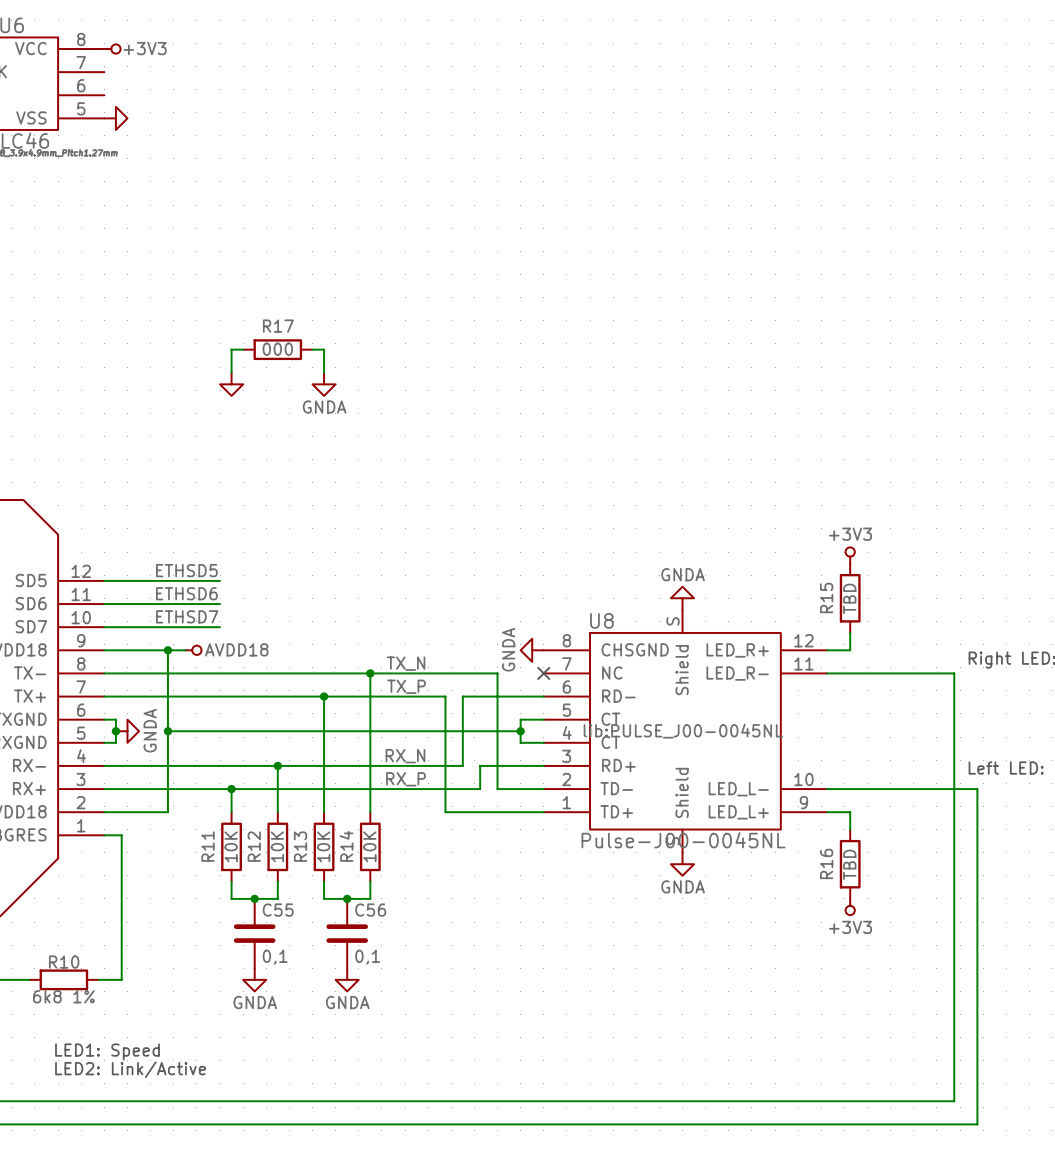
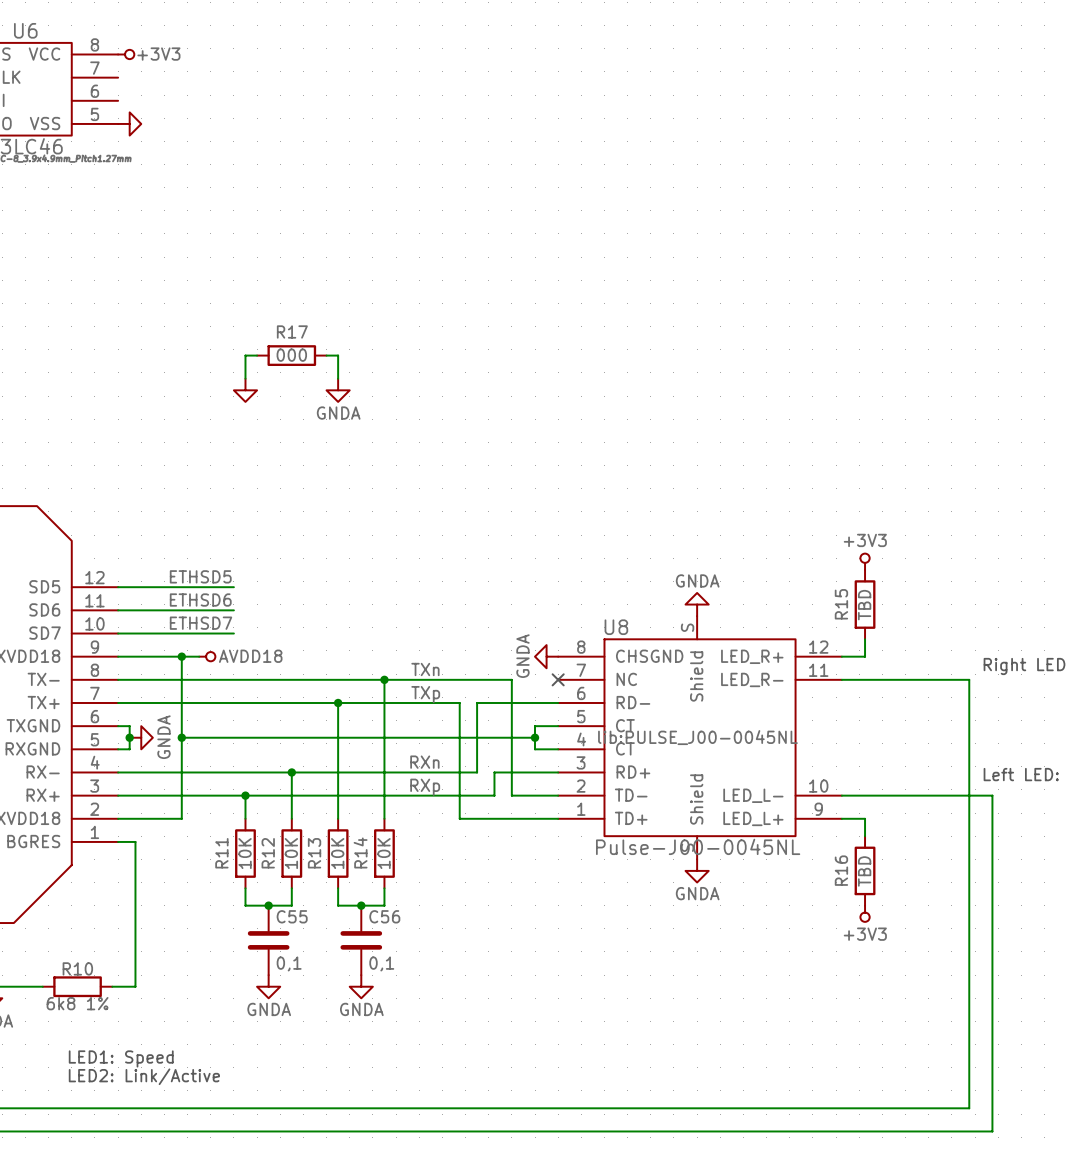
label: TX_N (406, 663) -> TXn (425, 669)
label: TX_P (406, 686) -> TXp (425, 694)
label: RX_N (405, 756) -> RXn (424, 762)
label: RX_P (406, 779) -> RXp (425, 787)

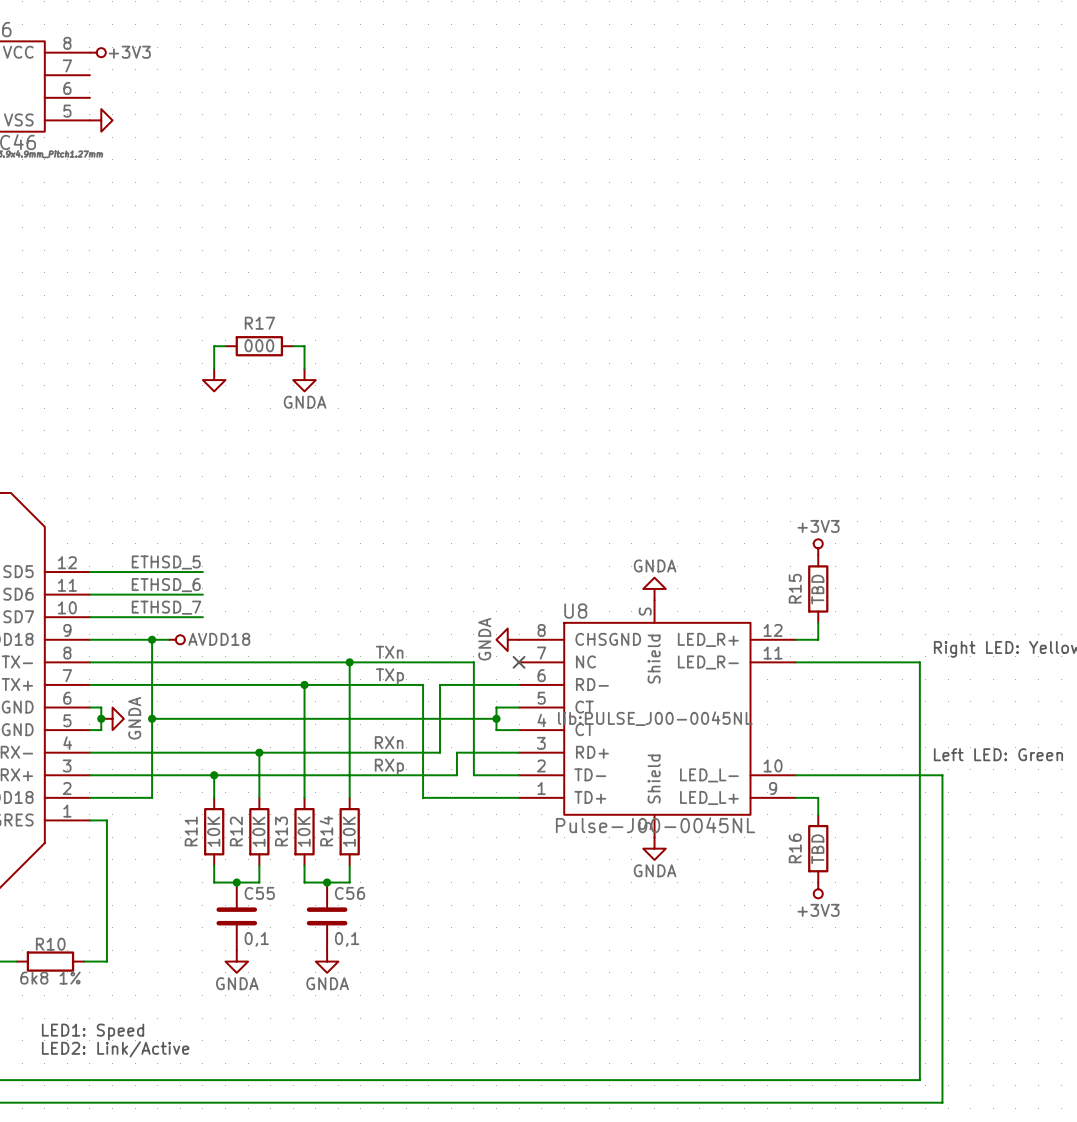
label: ETHSD5 (200, 576) -> ETHSD_5 (166, 562)
label: ETHSD6 (200, 600) -> ETHSD_6 (166, 585)
label: ETHSD7 (201, 623) -> ETHSD_7 (166, 607)

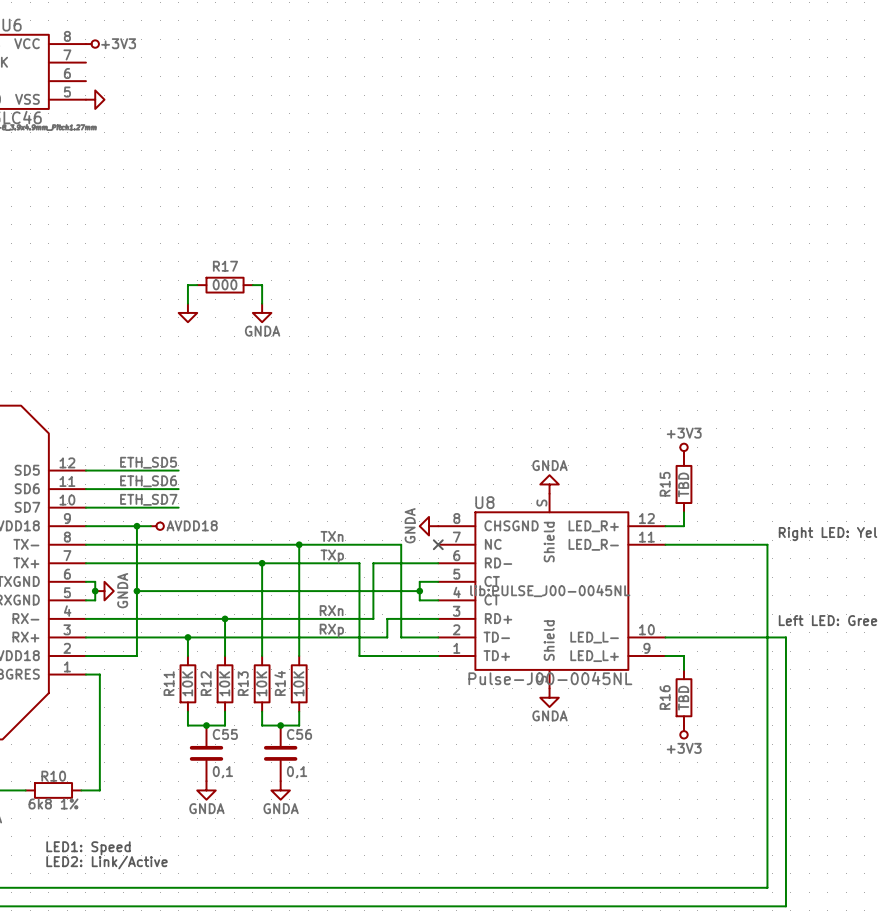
label: ETHSD_5 (166, 562) -> ETH_SD5 (148, 462)
label: ETHSD_6 (166, 585) -> ETH_SD6 (148, 481)
label: ETHSD_7 (166, 607) -> ETH_SD7 (148, 499)

